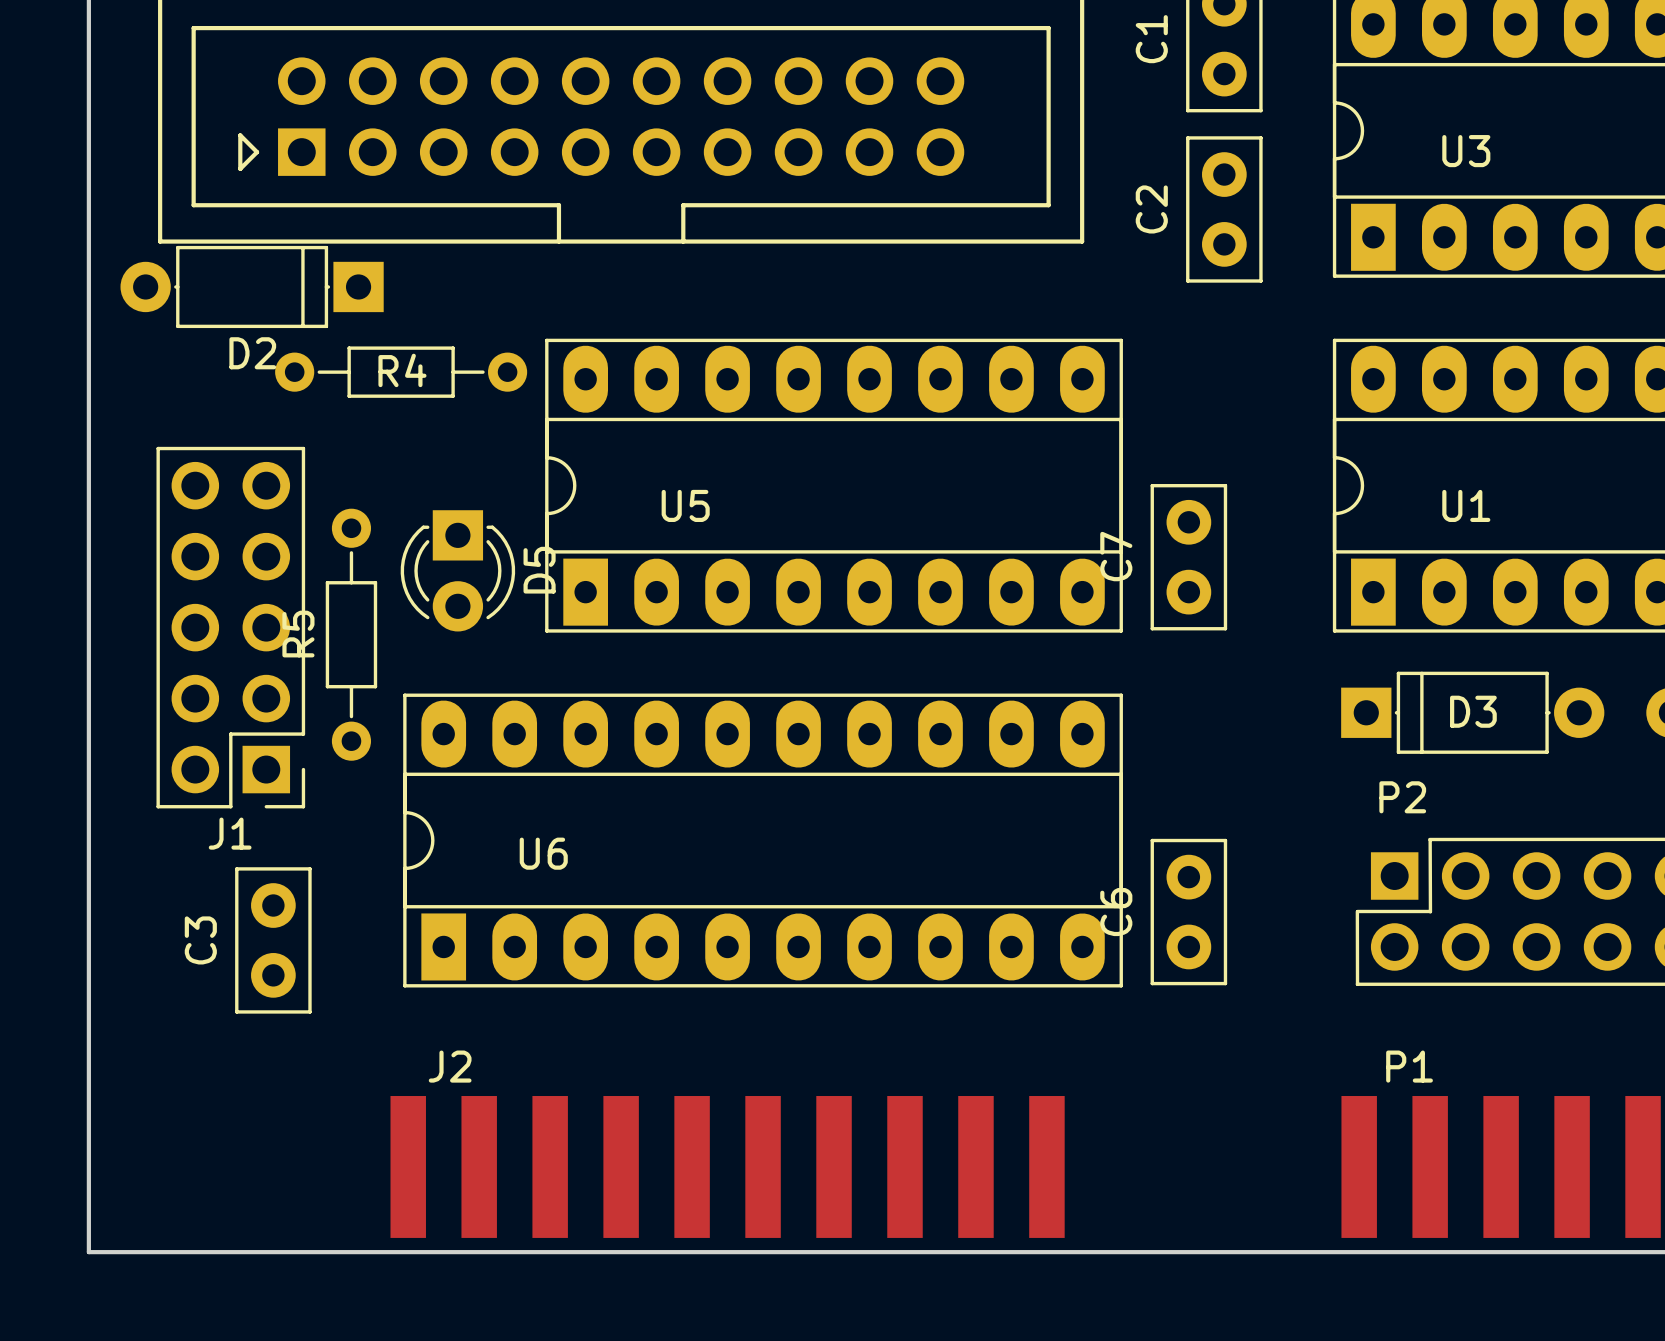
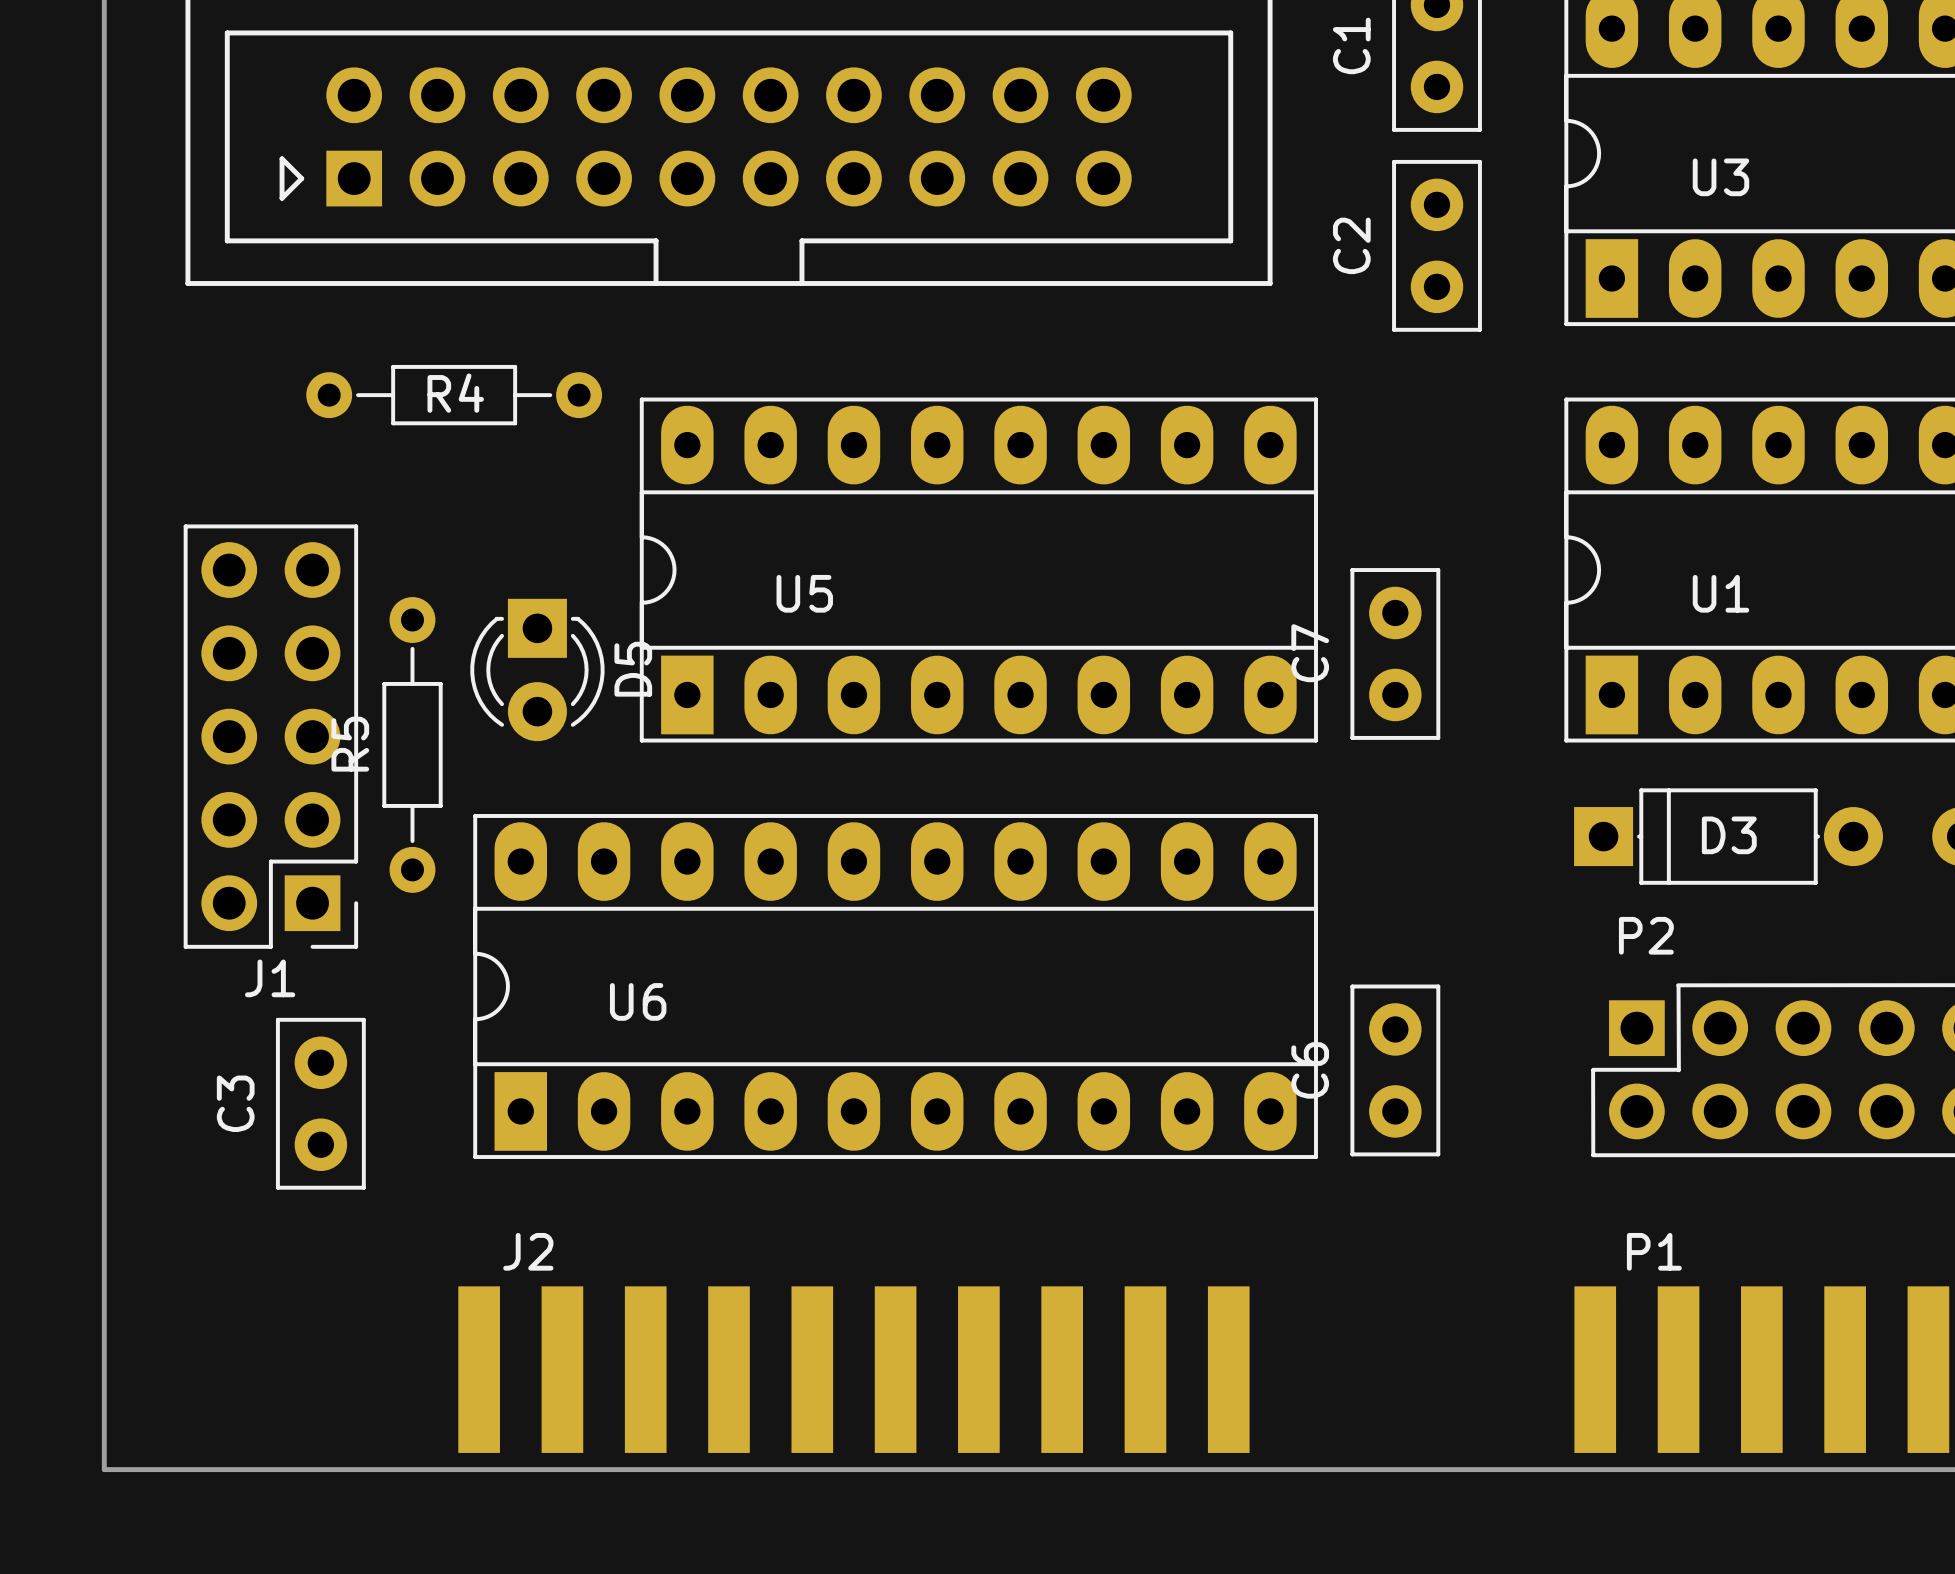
D2: (252, 286) -> none
R4 position: (401, 372) -> (454, 395)

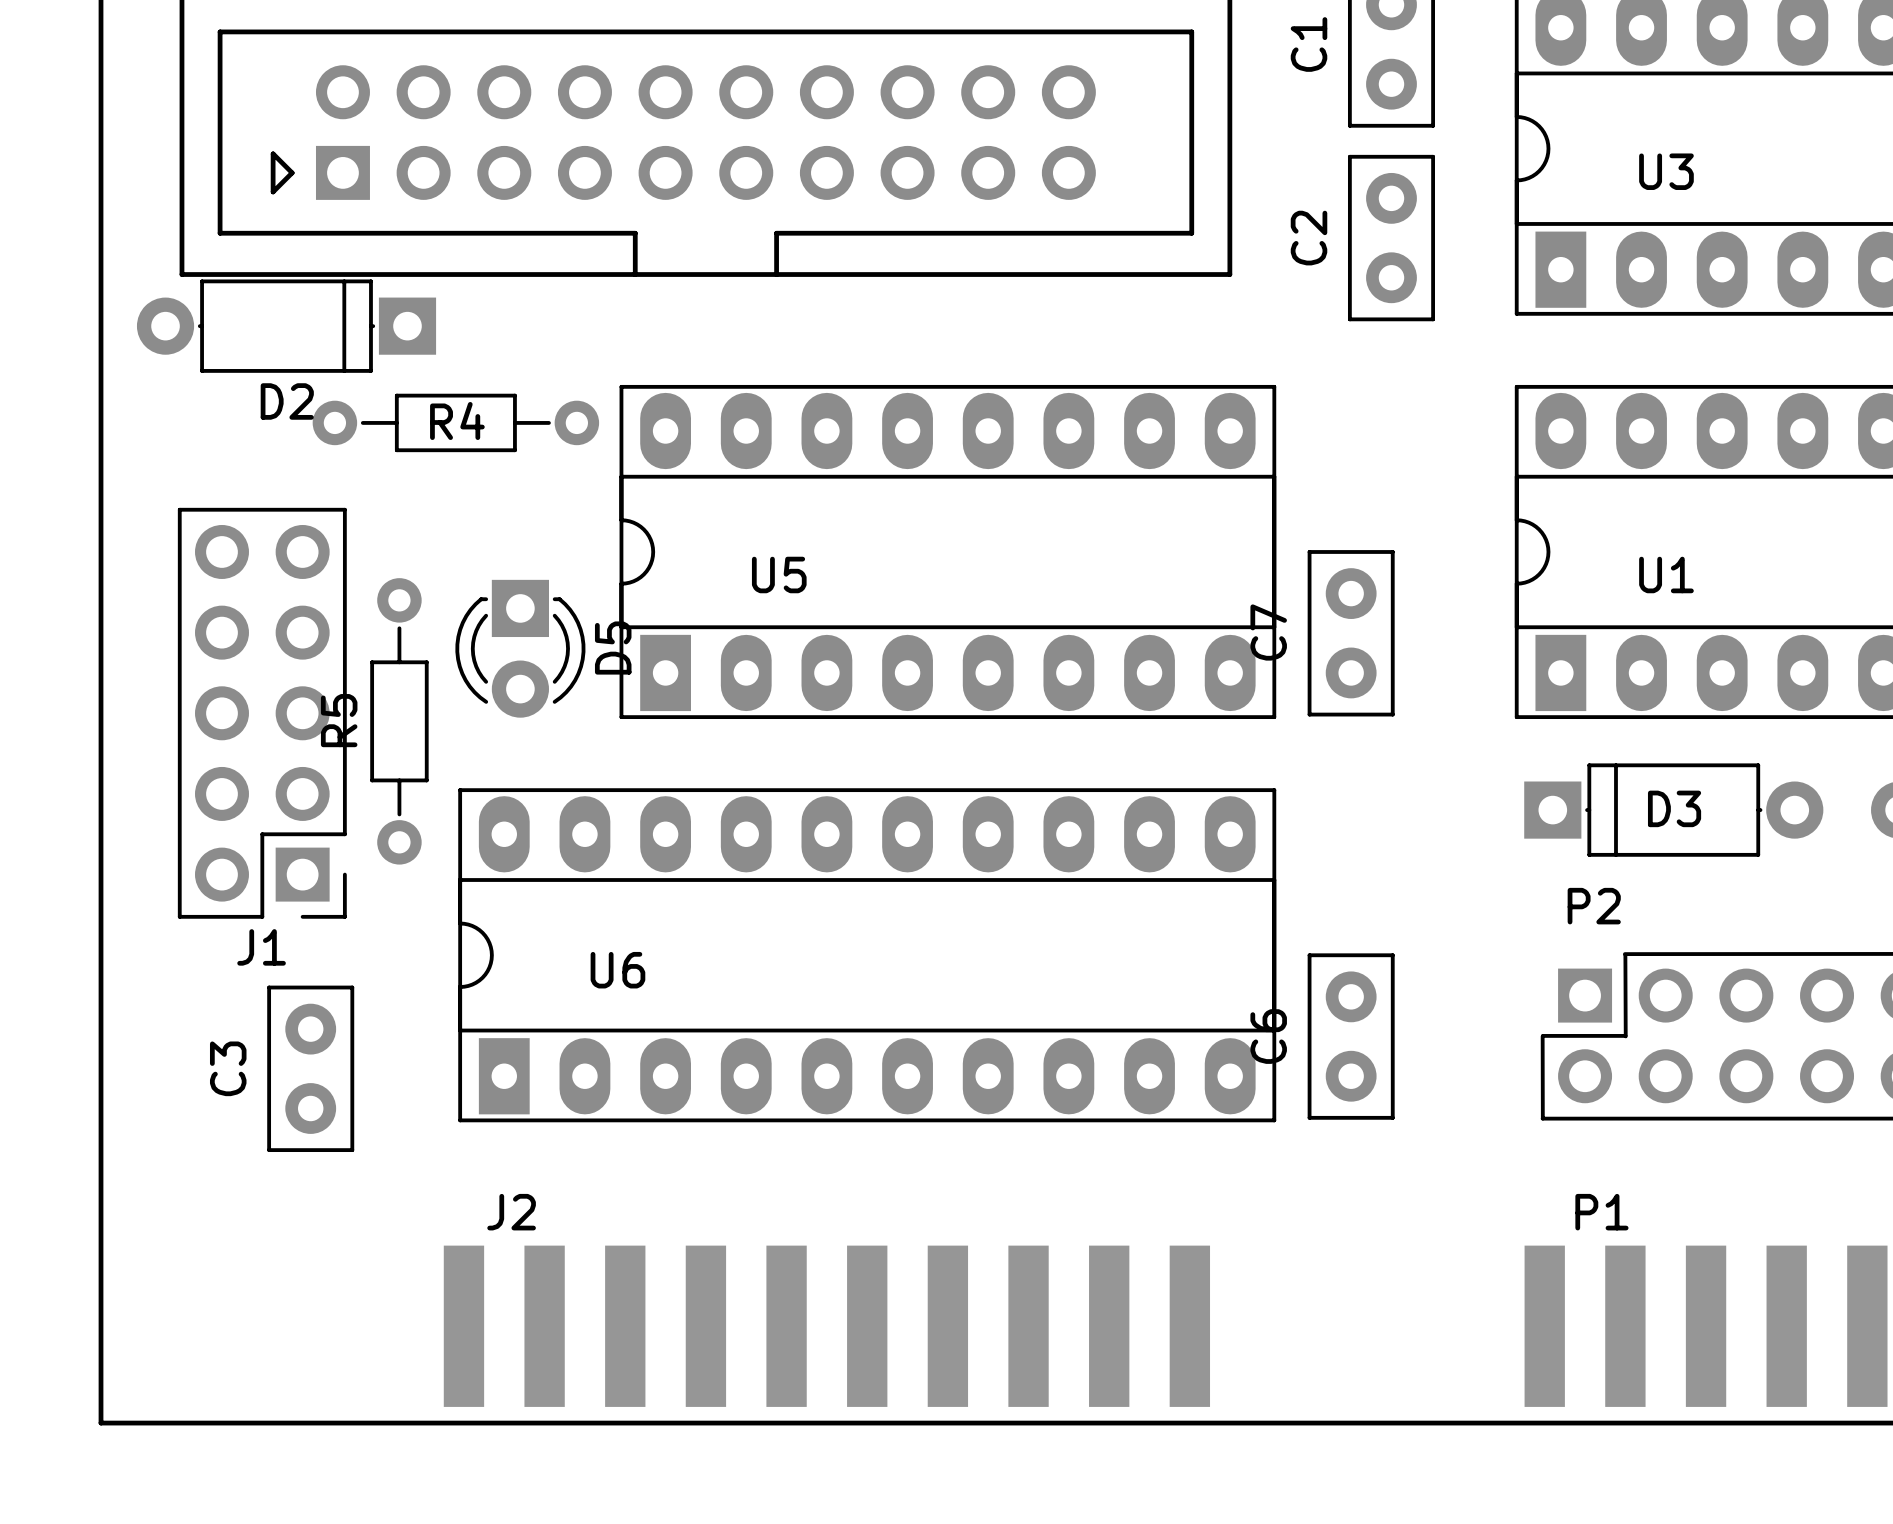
D2: none -> (286, 326)
R4 position: (454, 395) -> (455, 422)

